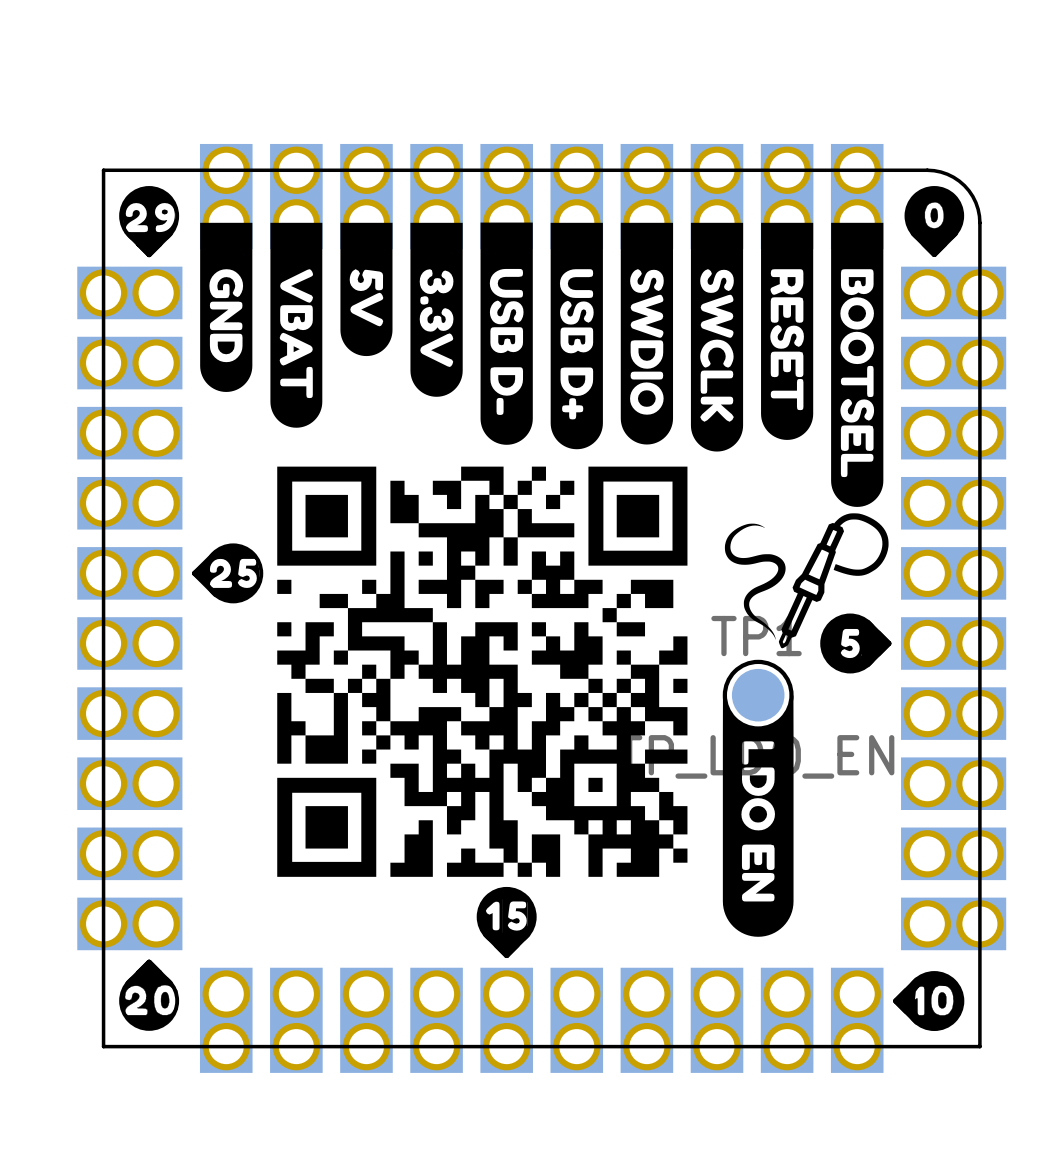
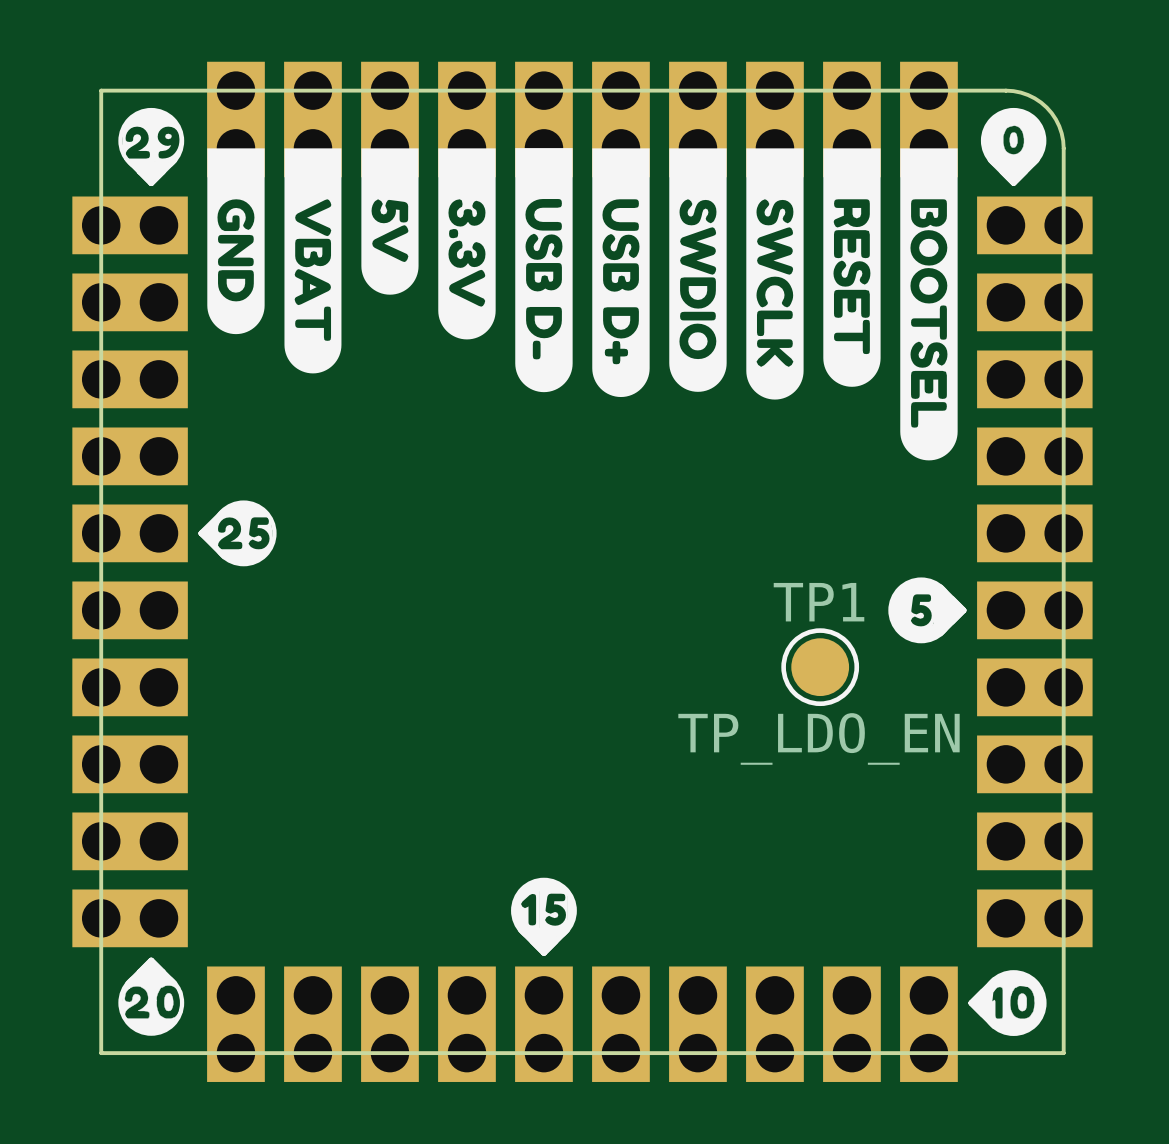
drawing: [277, 466, 889, 937] -> none

